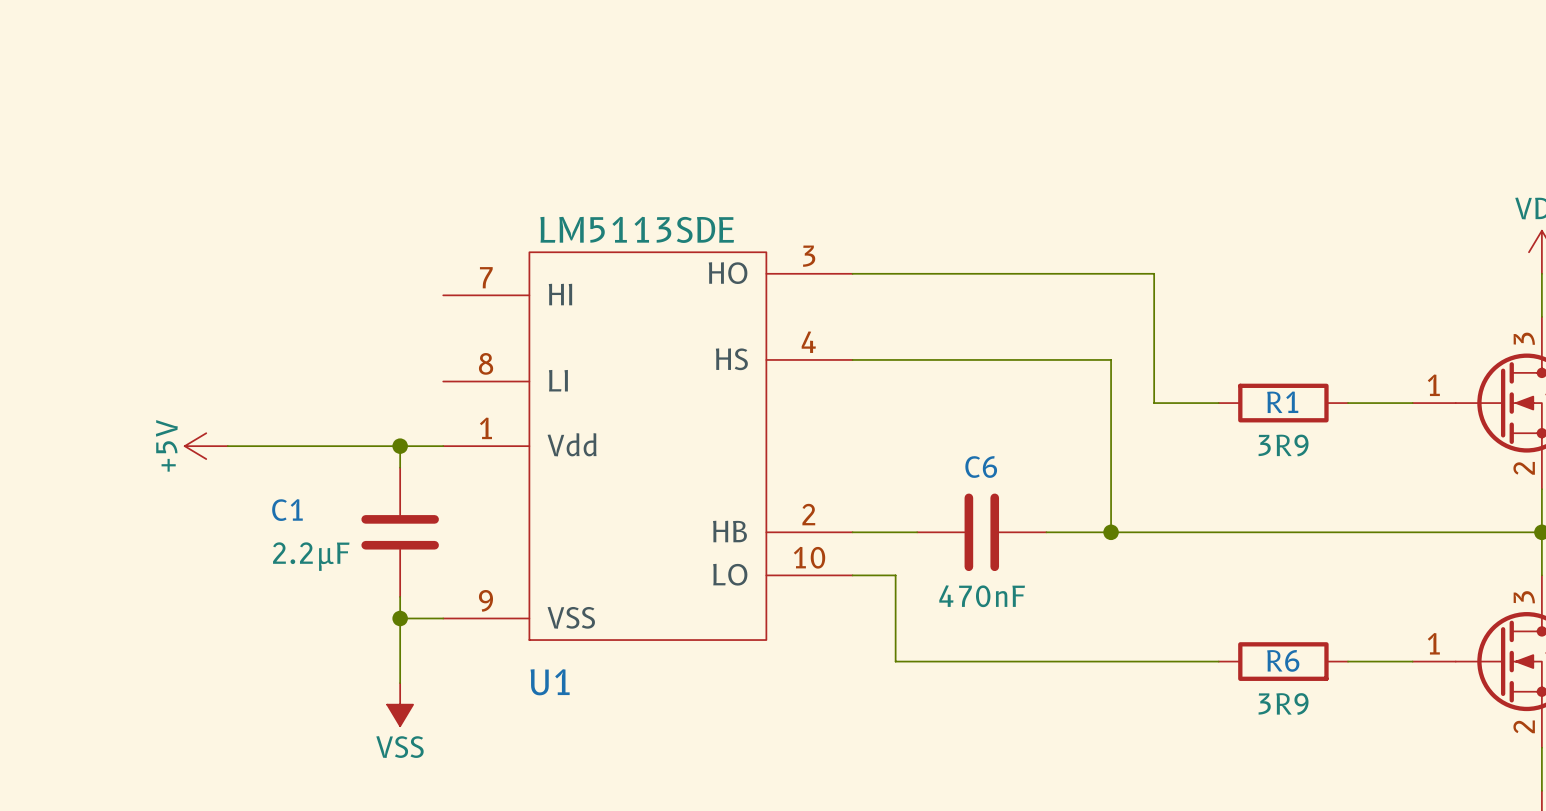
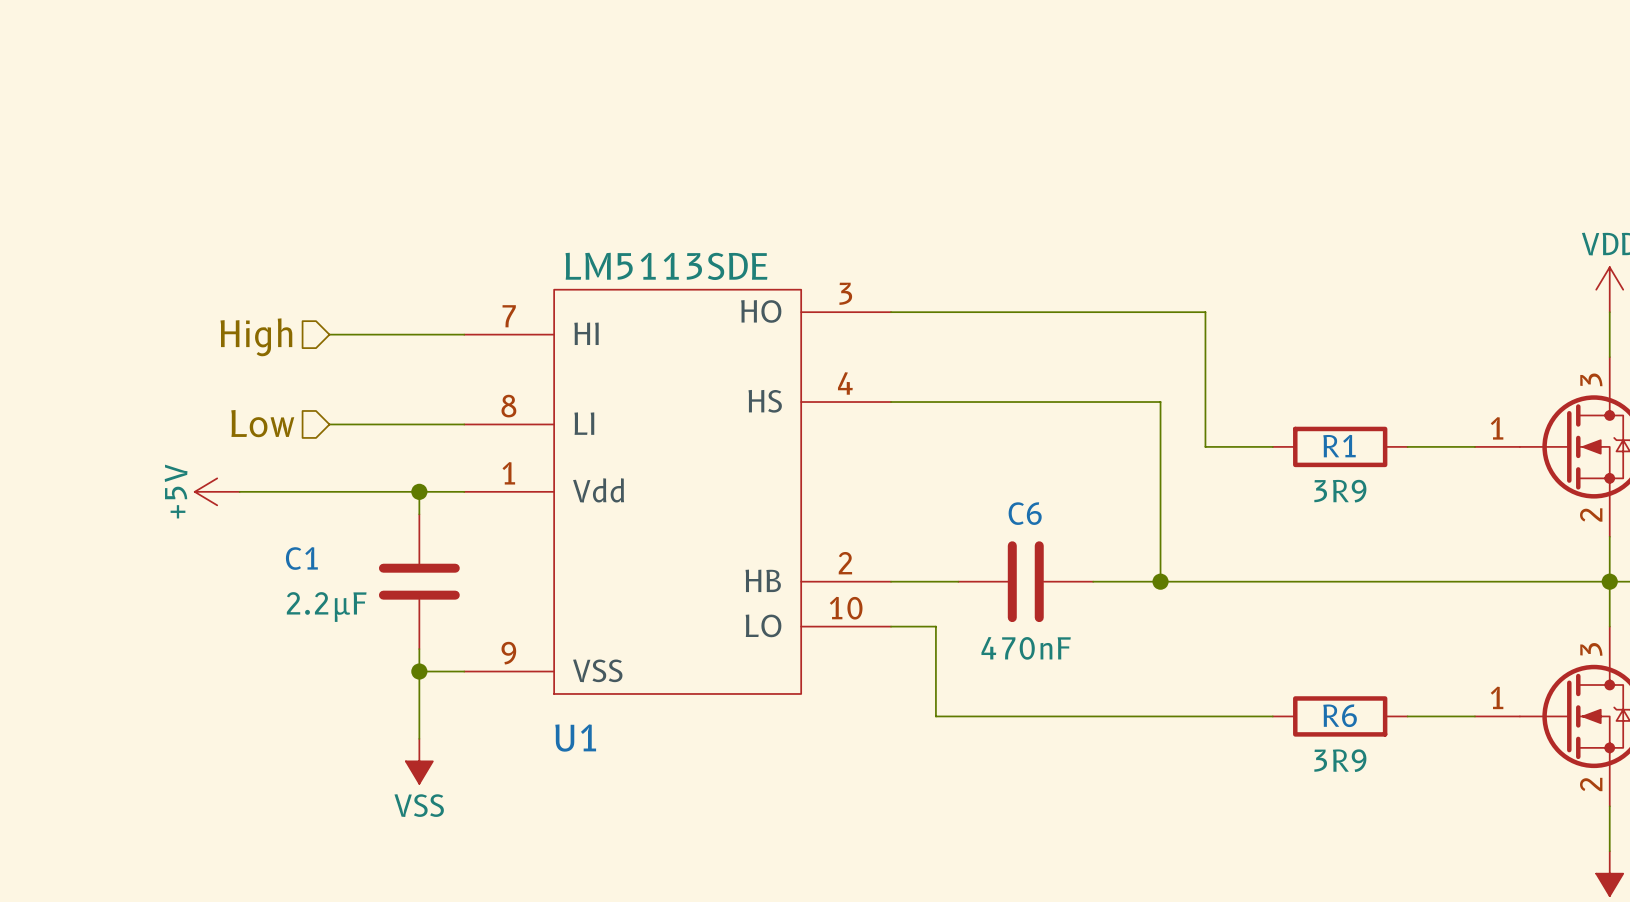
wire: none -> (329, 334) (464, 334)
hierarchical label: none -> High (256, 337)
hierarchical label: none -> Low (262, 423)
wire: none -> (329, 424) (464, 424)

